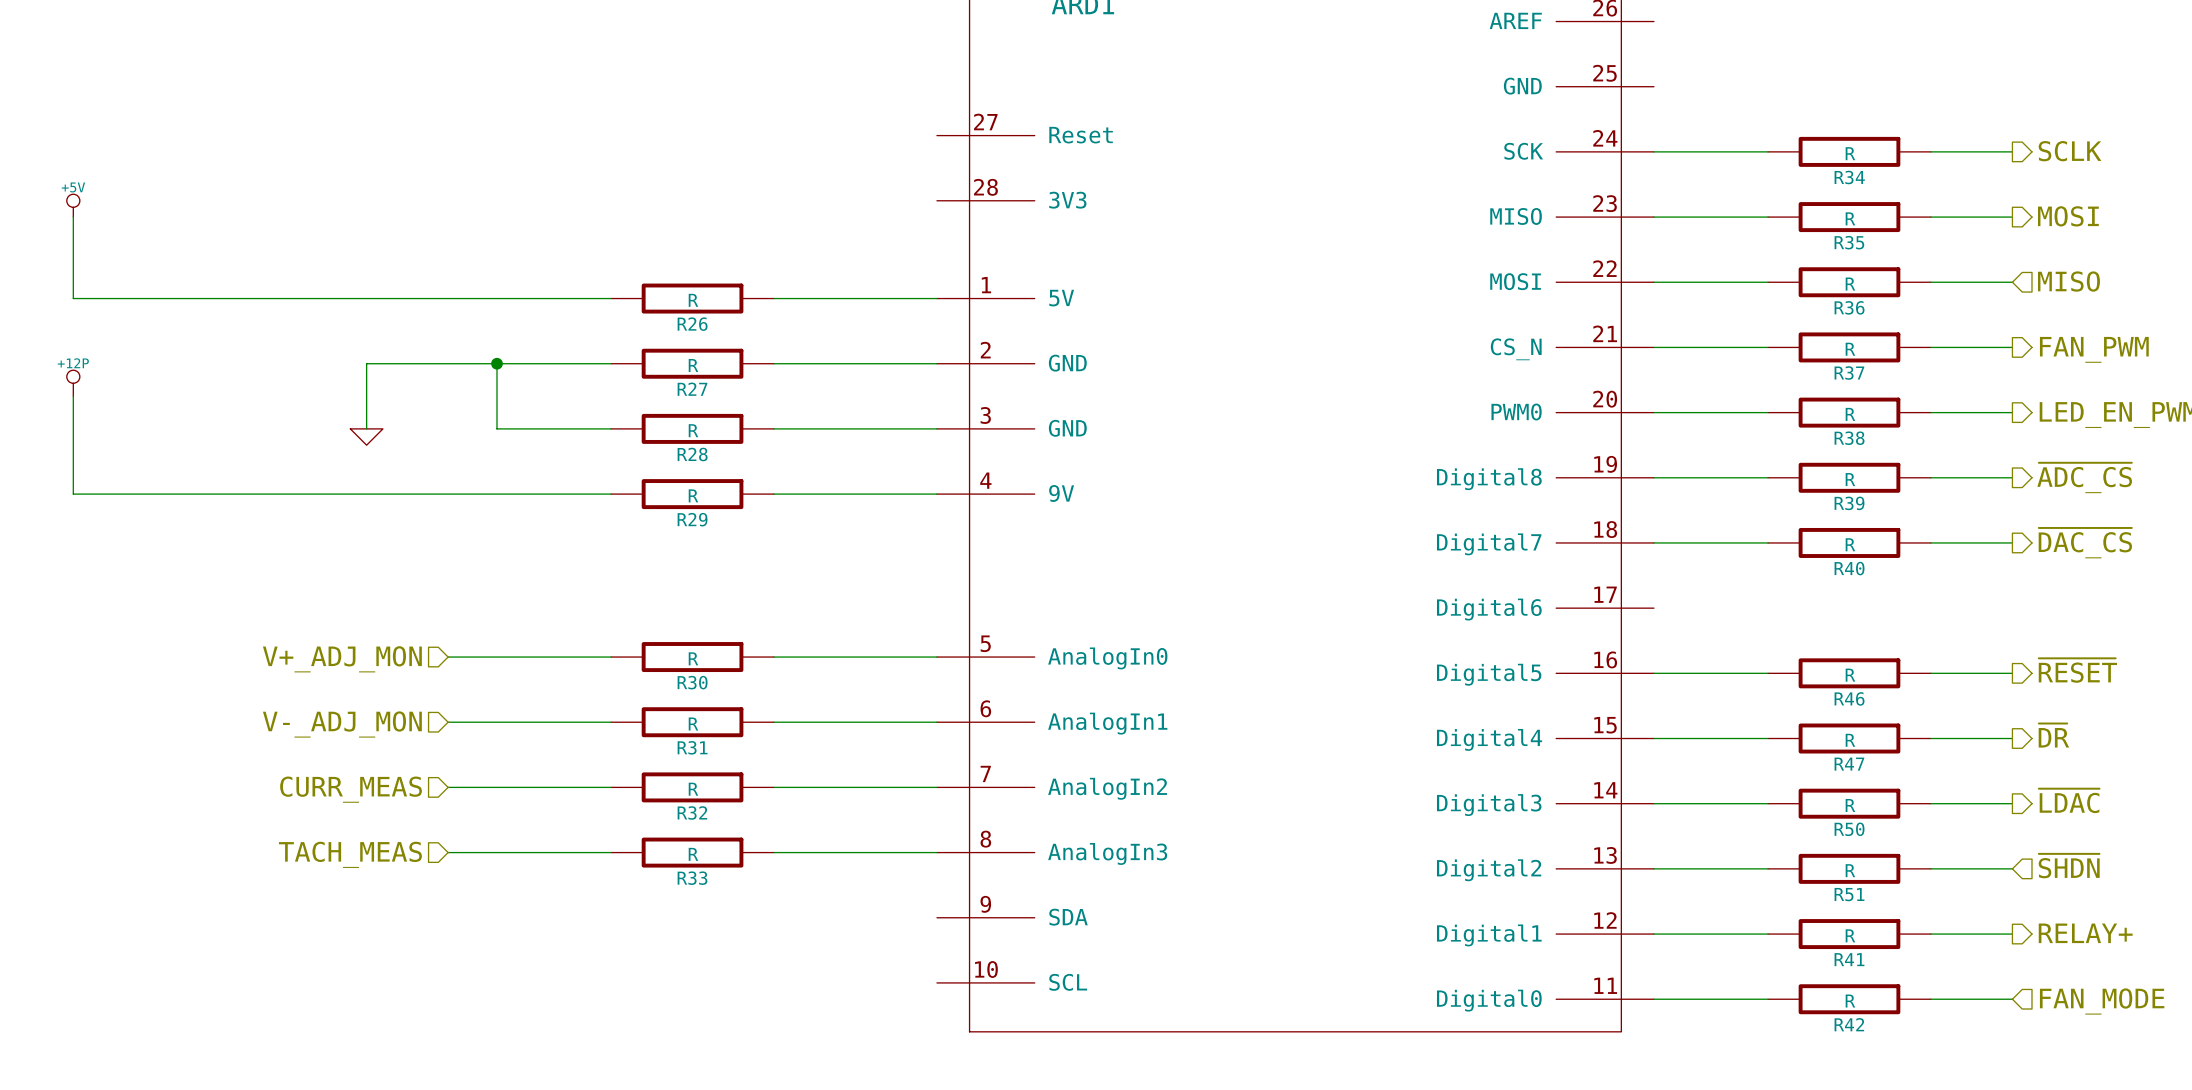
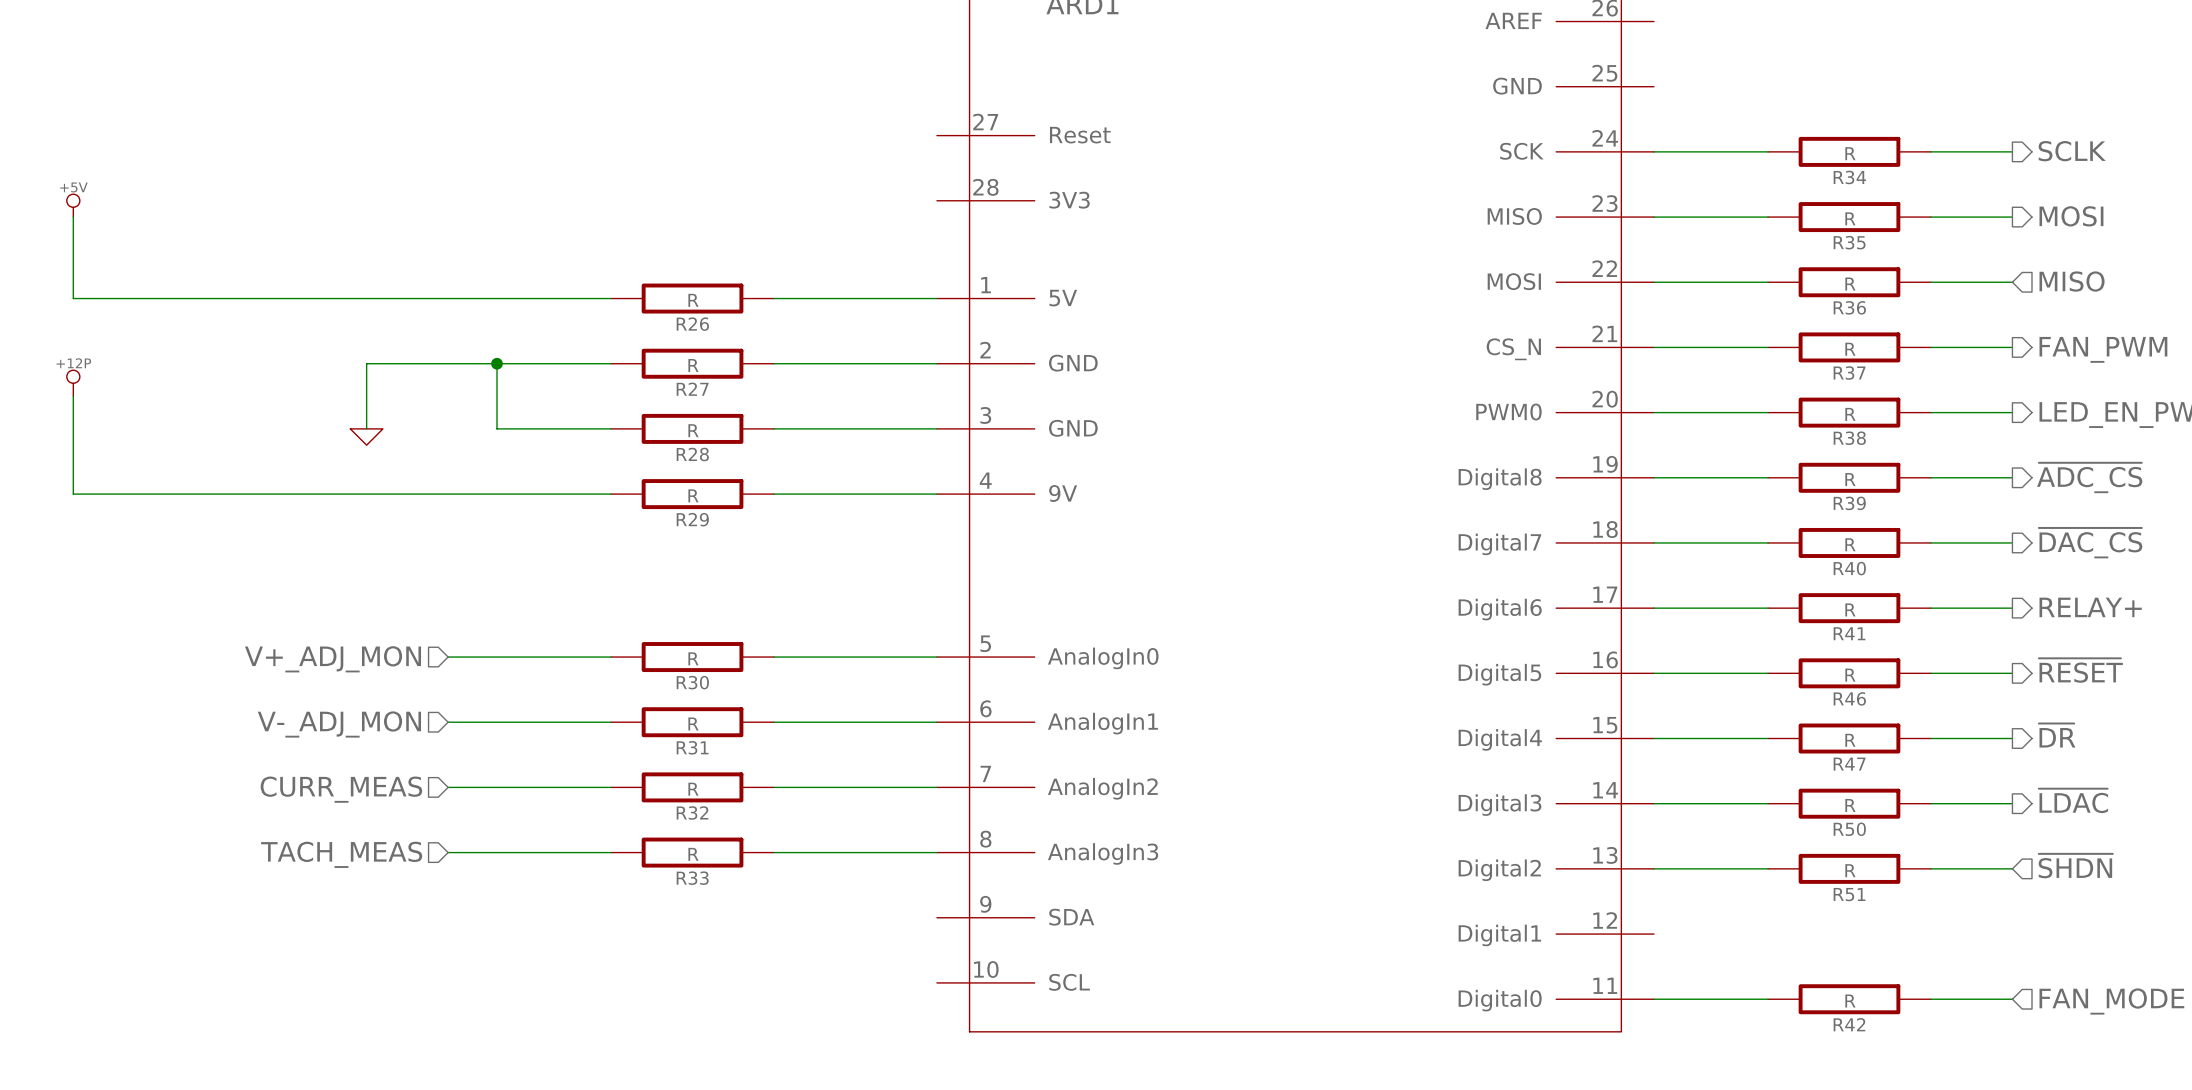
hierarchical label: none -> RELAY+ (2090, 607)
wire: none -> (1653, 608) (1768, 608)
wire: none -> (1930, 608) (2012, 608)
hierarchical label: RELAY+ (2085, 933) -> none
wire: (1653, 934) (1768, 934) -> none
R41 position: (1849, 934) -> (1849, 608)
wire: (1930, 934) (2012, 934) -> none

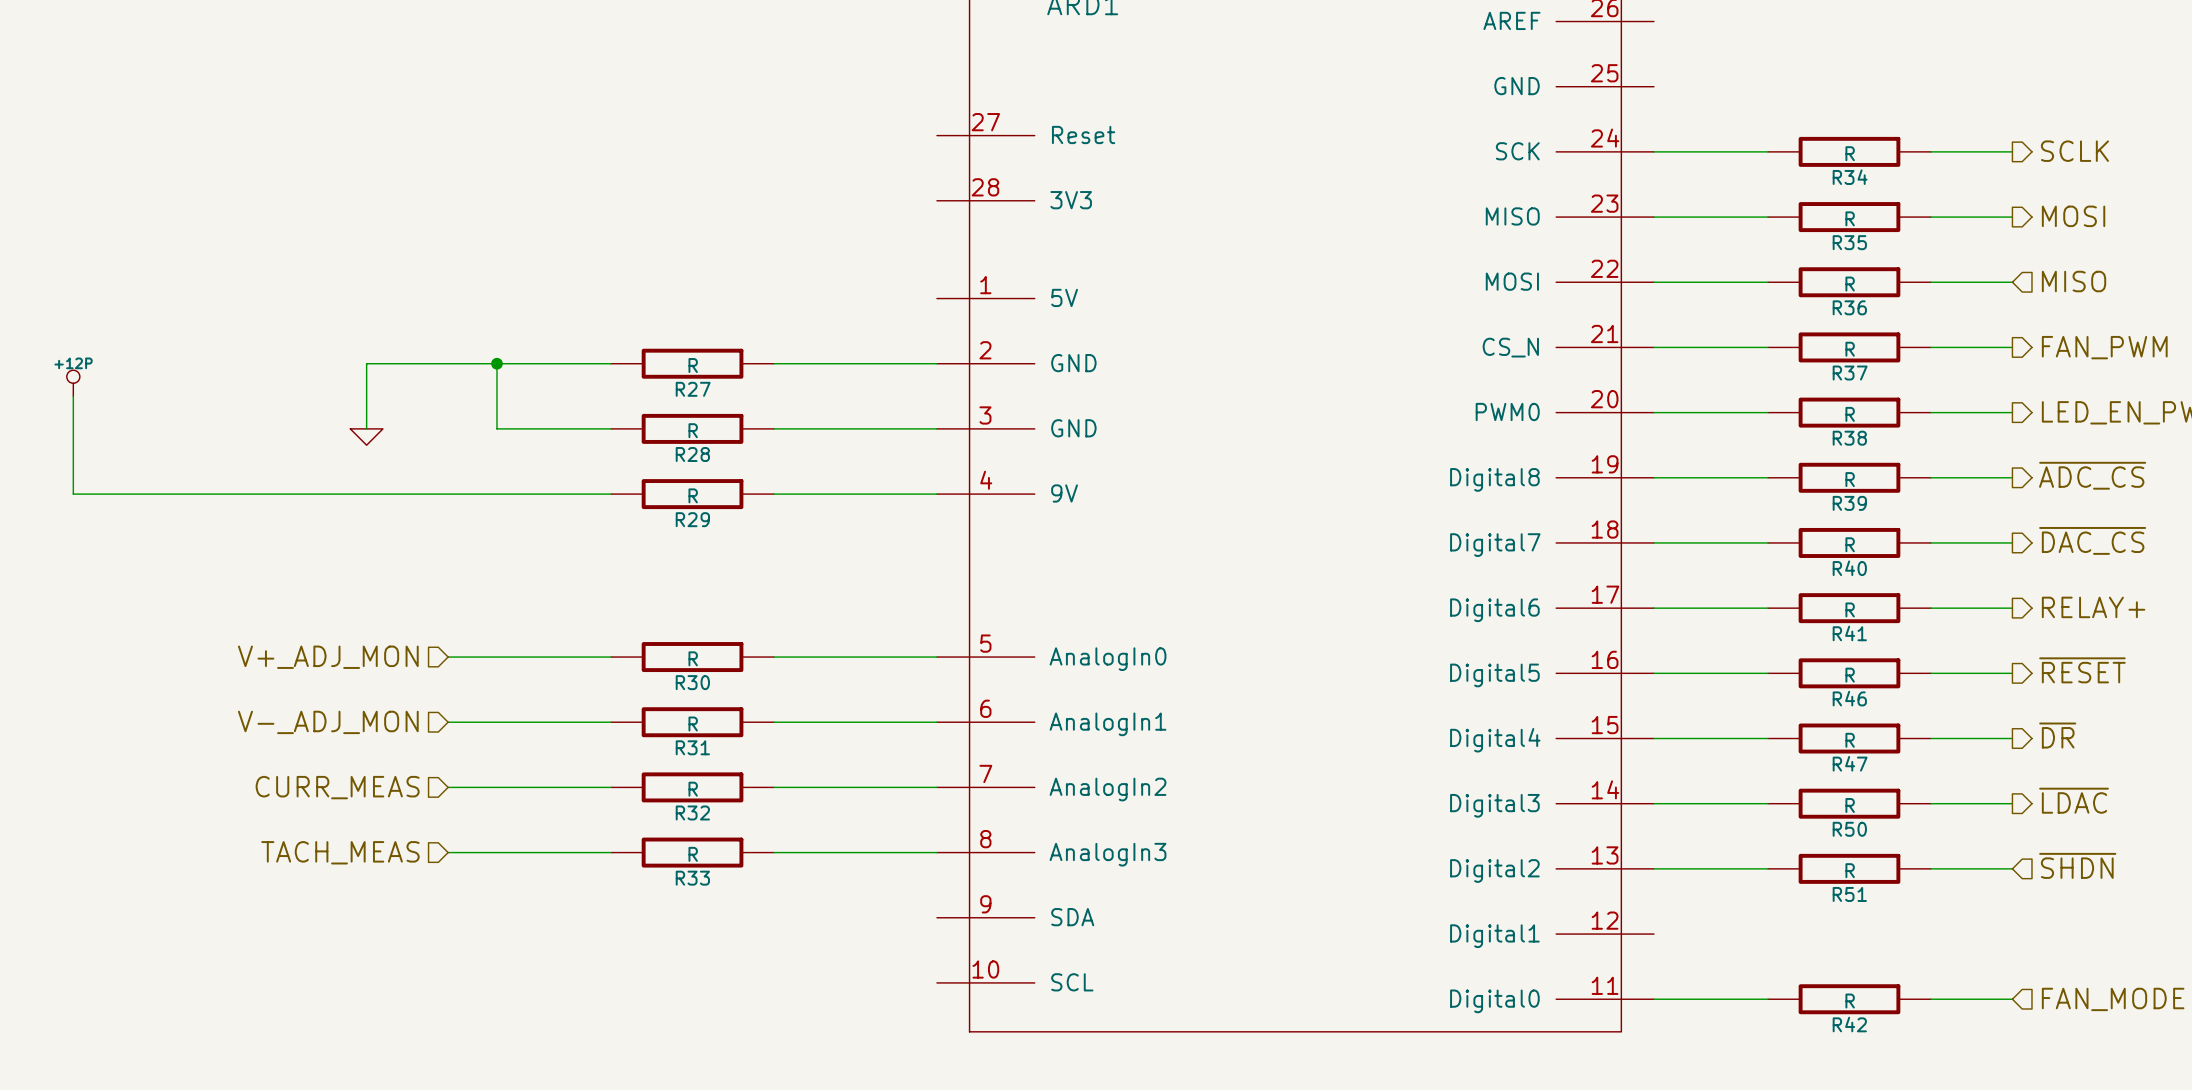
power symbol: +5V (73, 205) -> none
wire: (73, 217) (73, 298) (611, 298) -> none
R26: R (692, 298) -> none
wire: (774, 298) (936, 298) -> none

